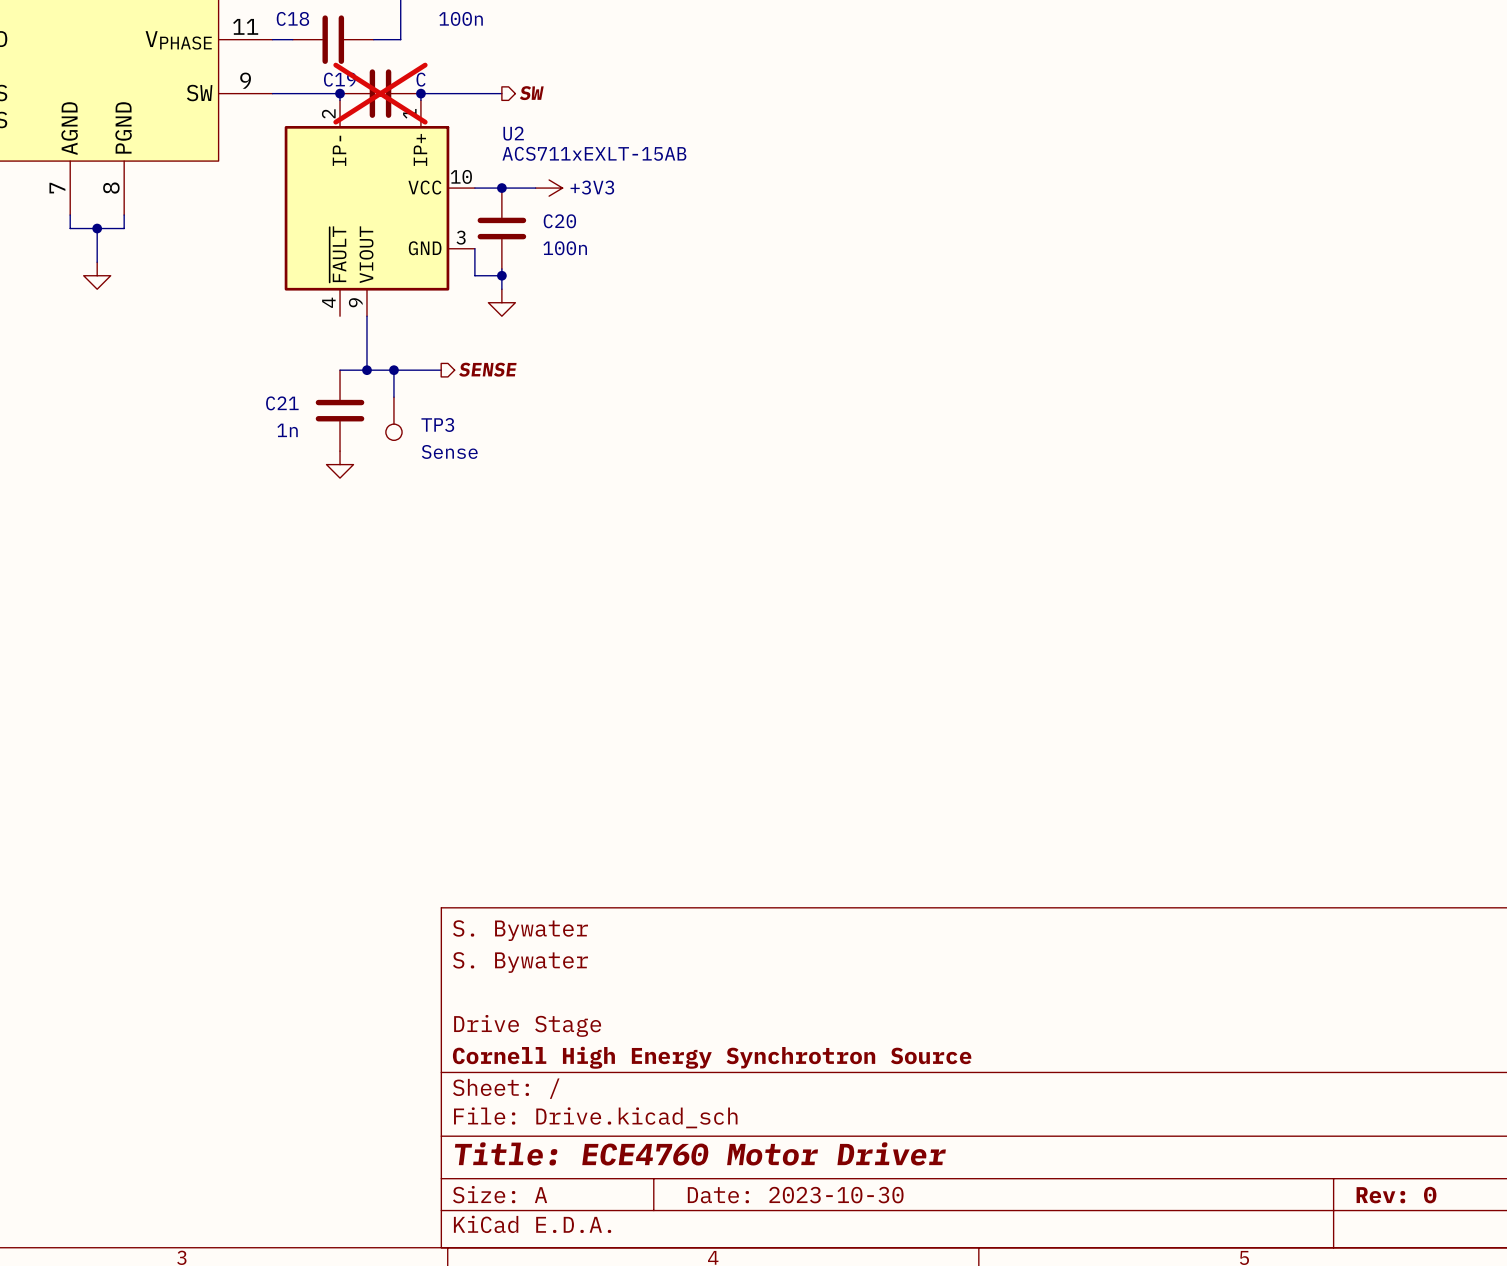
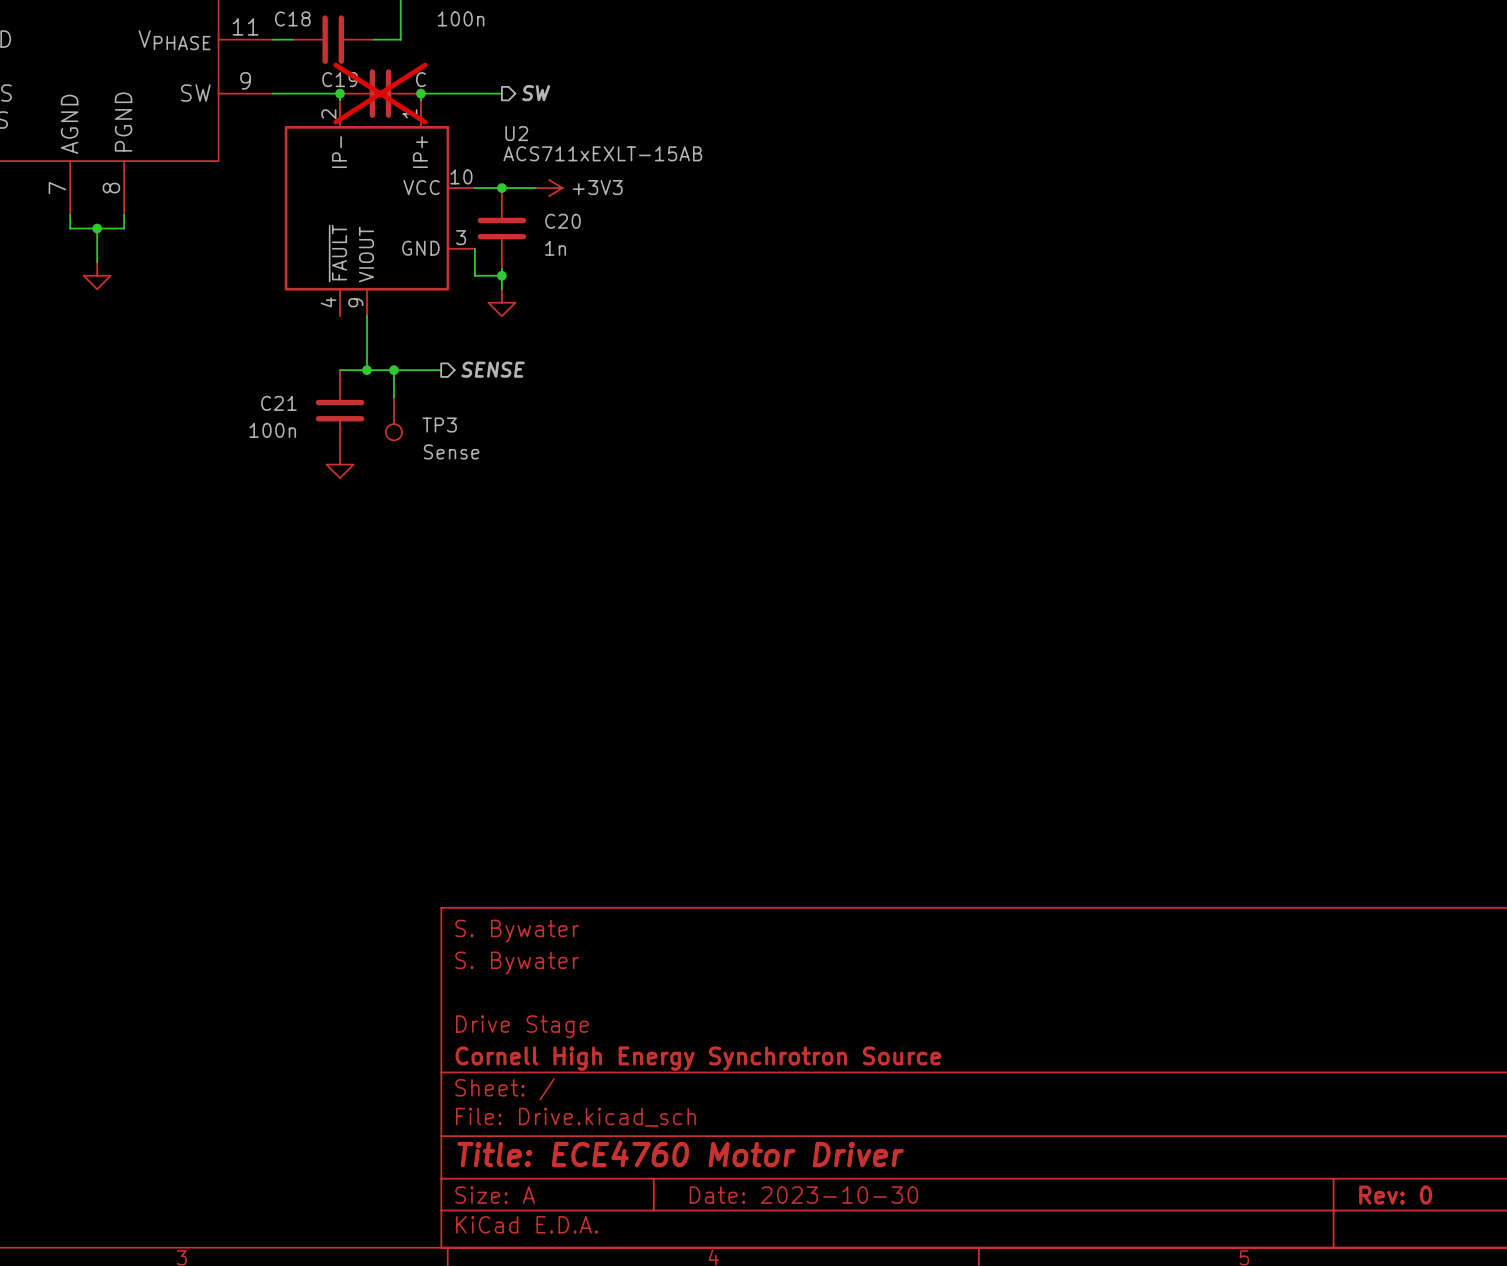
C20 value: 100n (565, 248) -> 1n (555, 248)
C21 value: 1n (287, 430) -> 100n (272, 430)

